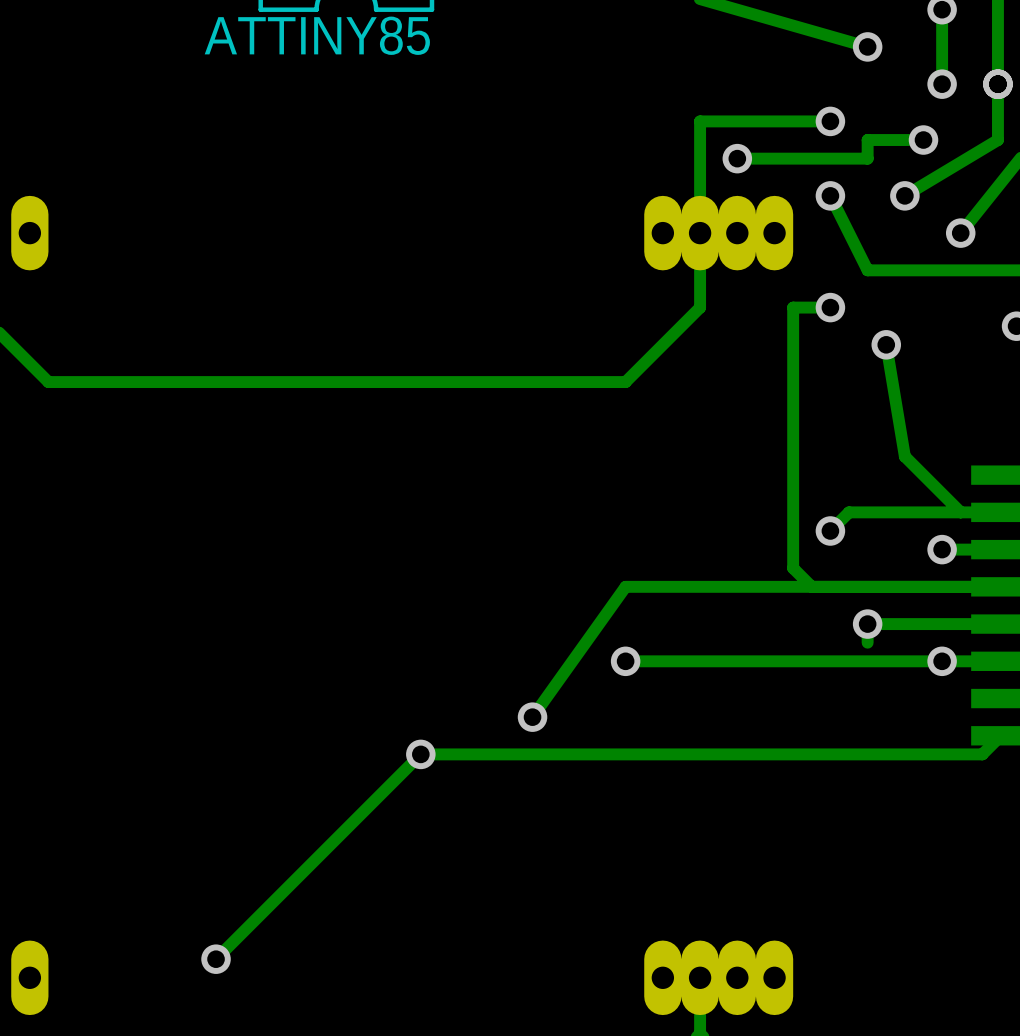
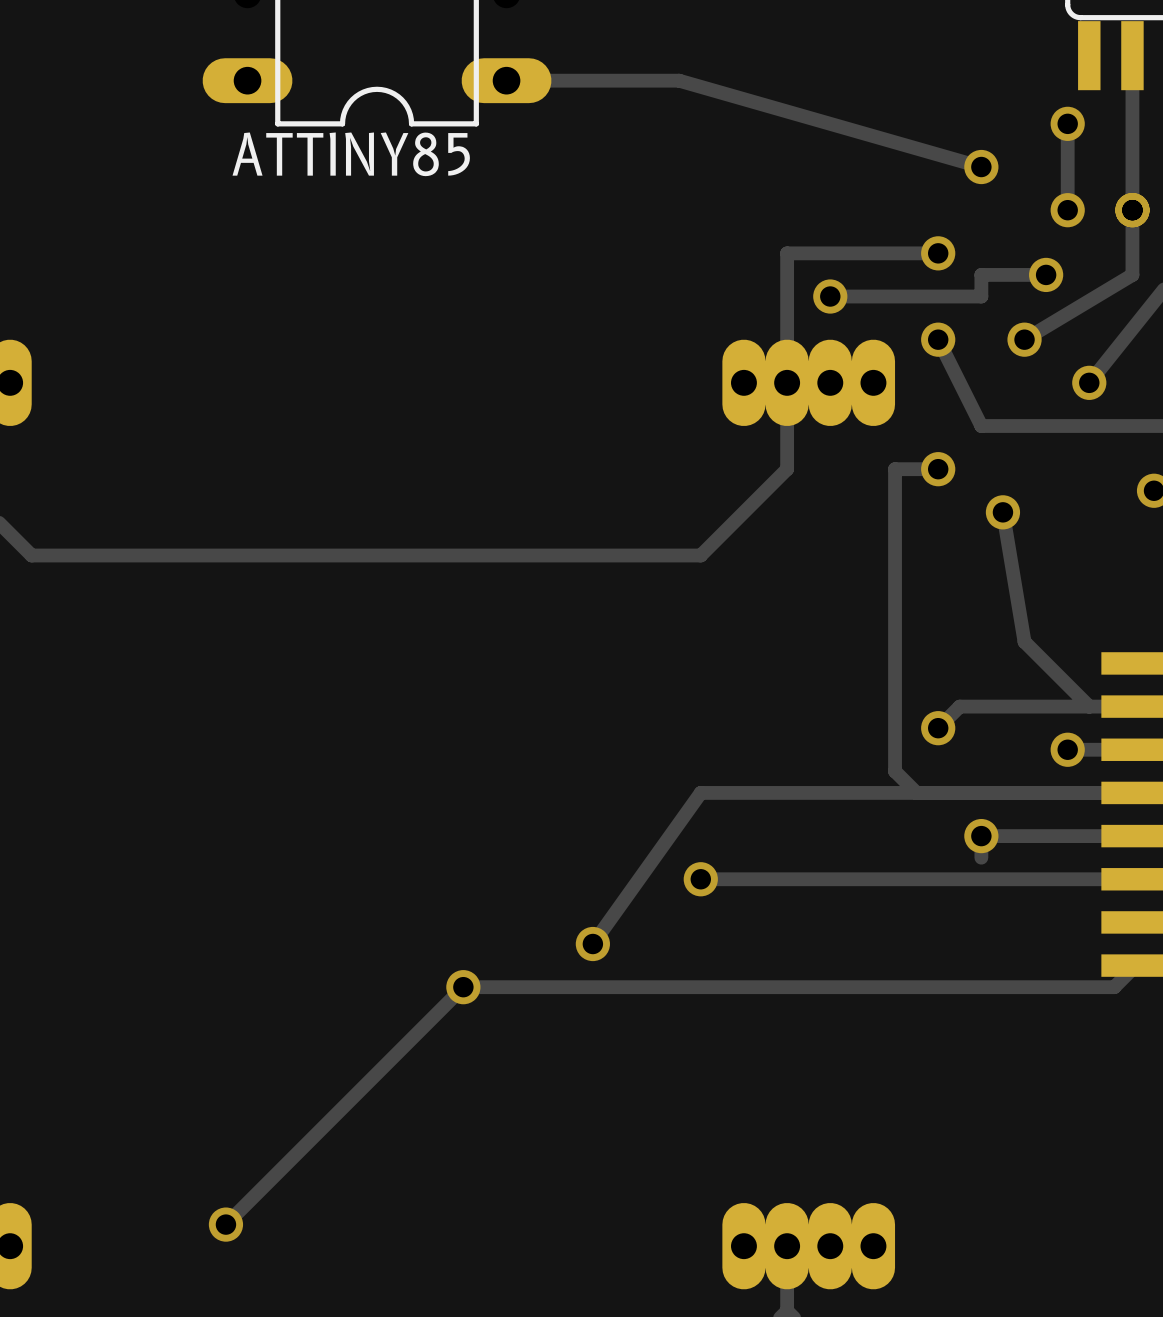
via: (942, 661) -> none

